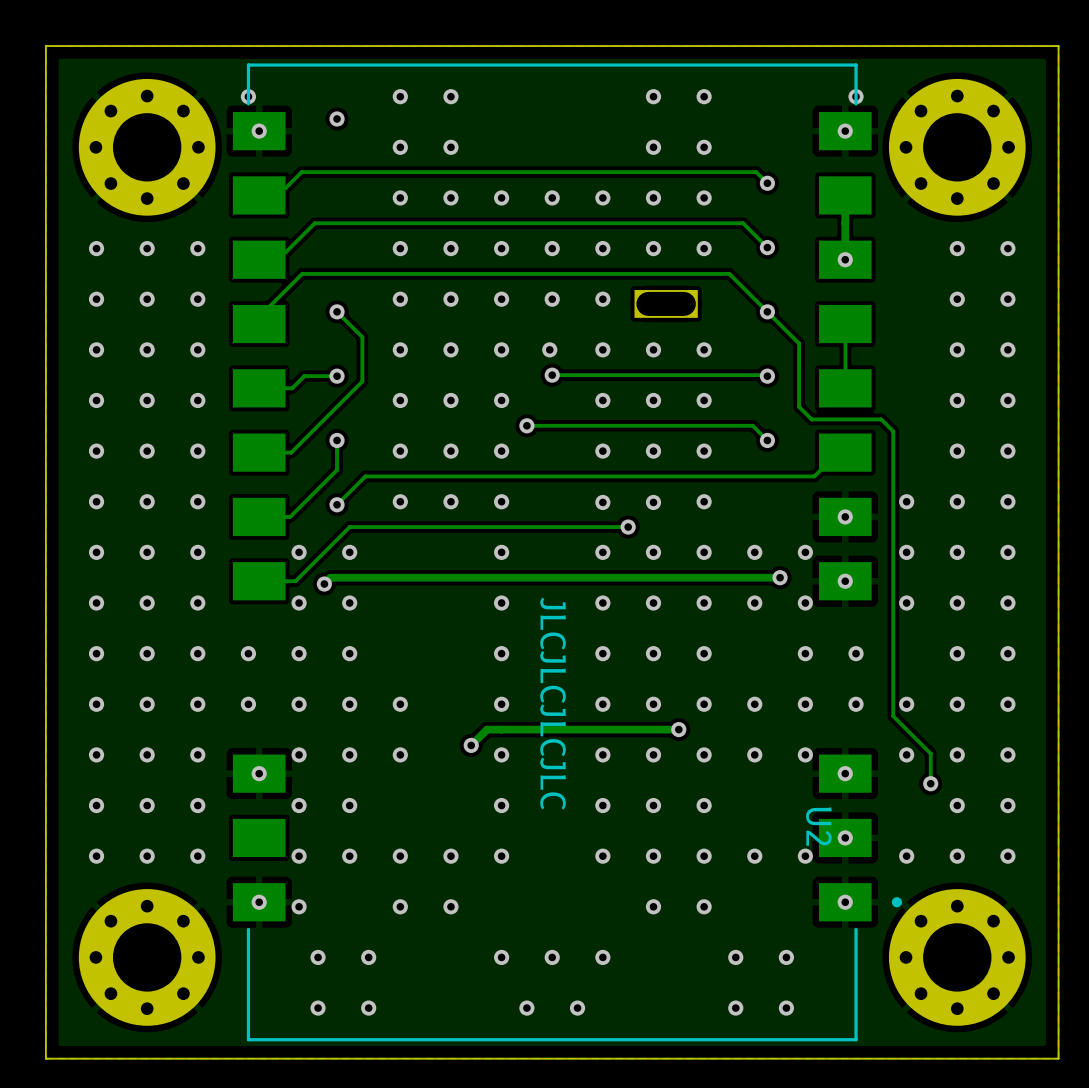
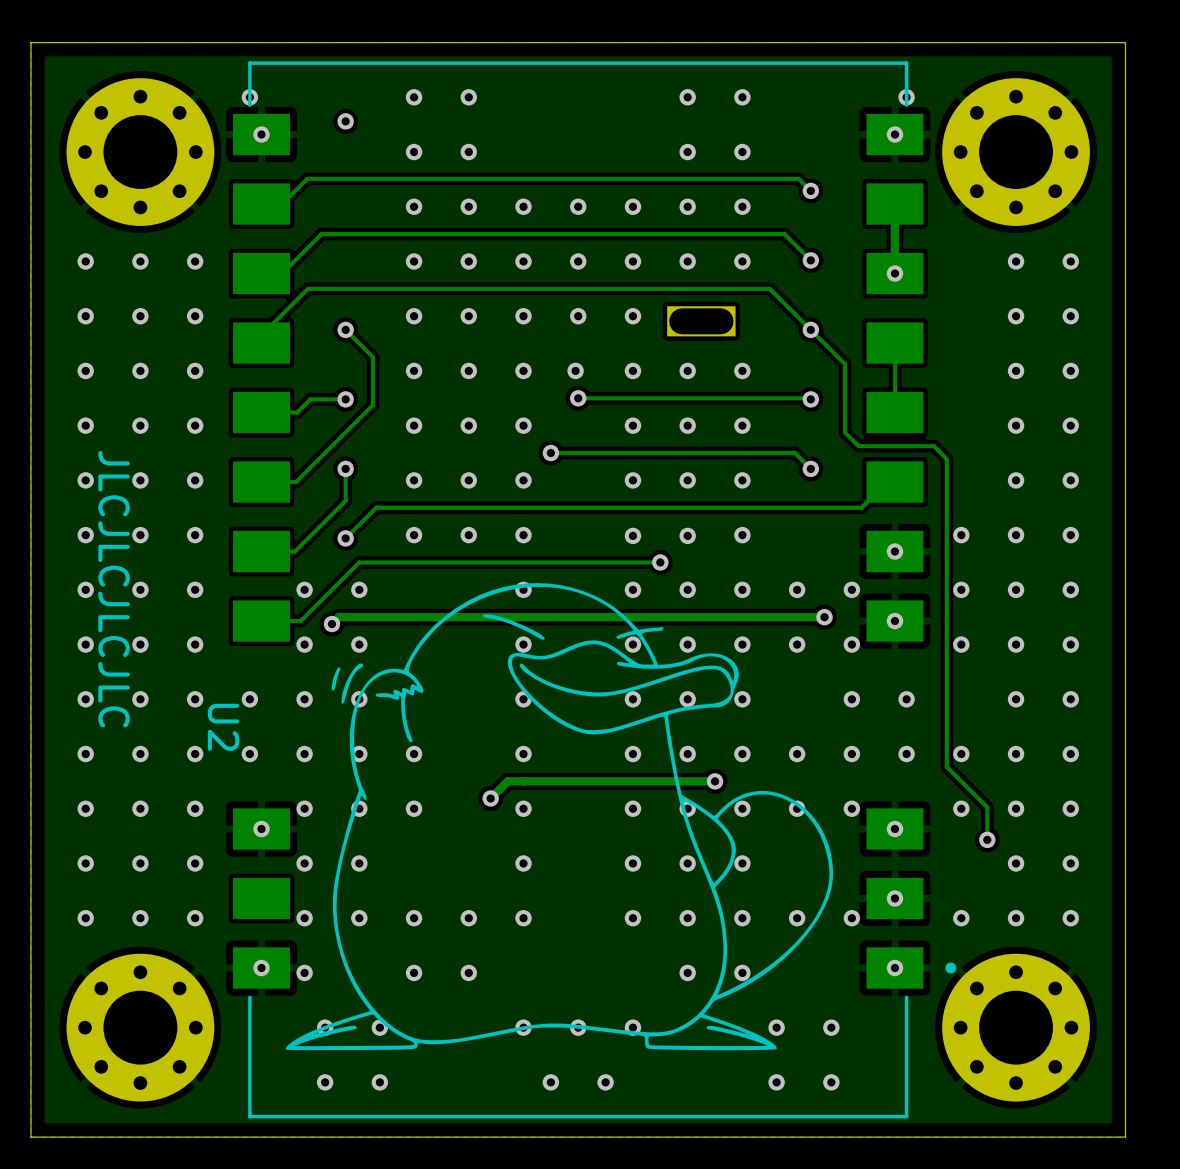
drawing: none -> [285, 583, 834, 1051]
text position: JLCJLCJLCJLC (553, 703) -> JLCJLCJLCJLC (114, 589)
U2 name position: U2 (818, 826) -> U2 (223, 727)

